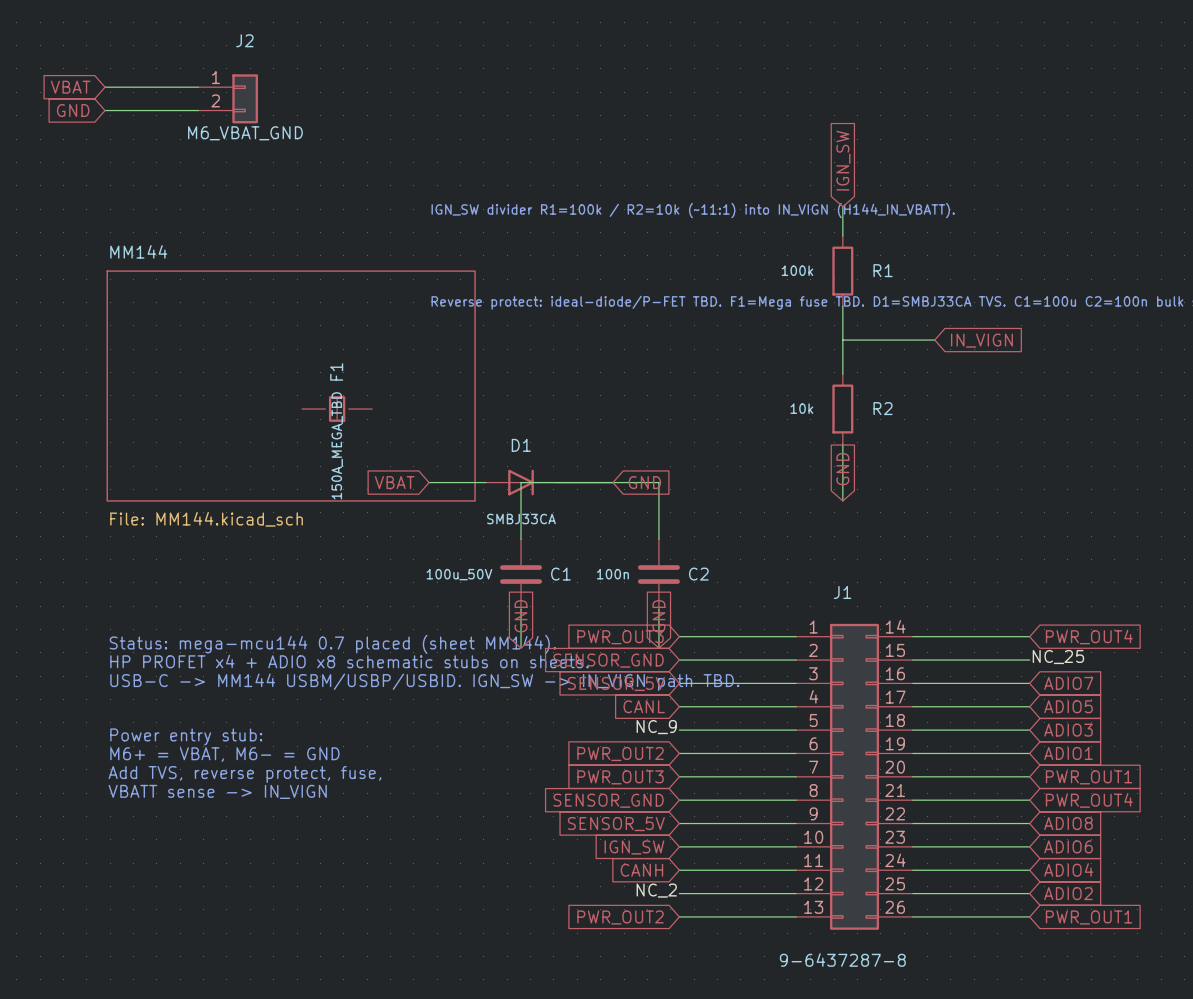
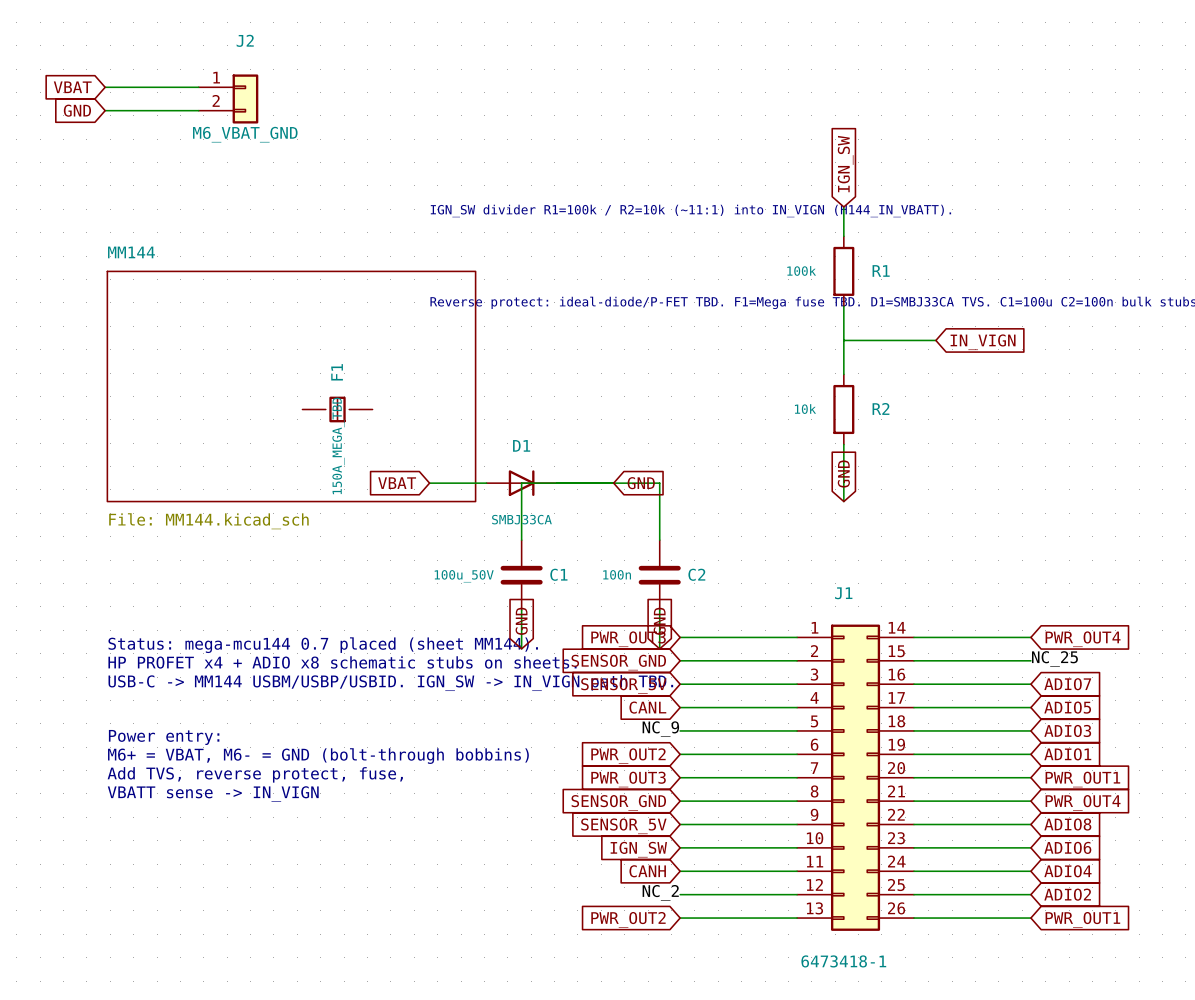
text: Power entry stub: (186, 736) -> Power entry: (164, 737)
text: M6+ = VBAT, M6- = GND (224, 754) -> M6+ = VBAT, M6- = GND (bolt-through bobbins) (318, 756)
J1 value: 9-6437287-8 (842, 960) -> 6473418-1 (843, 961)

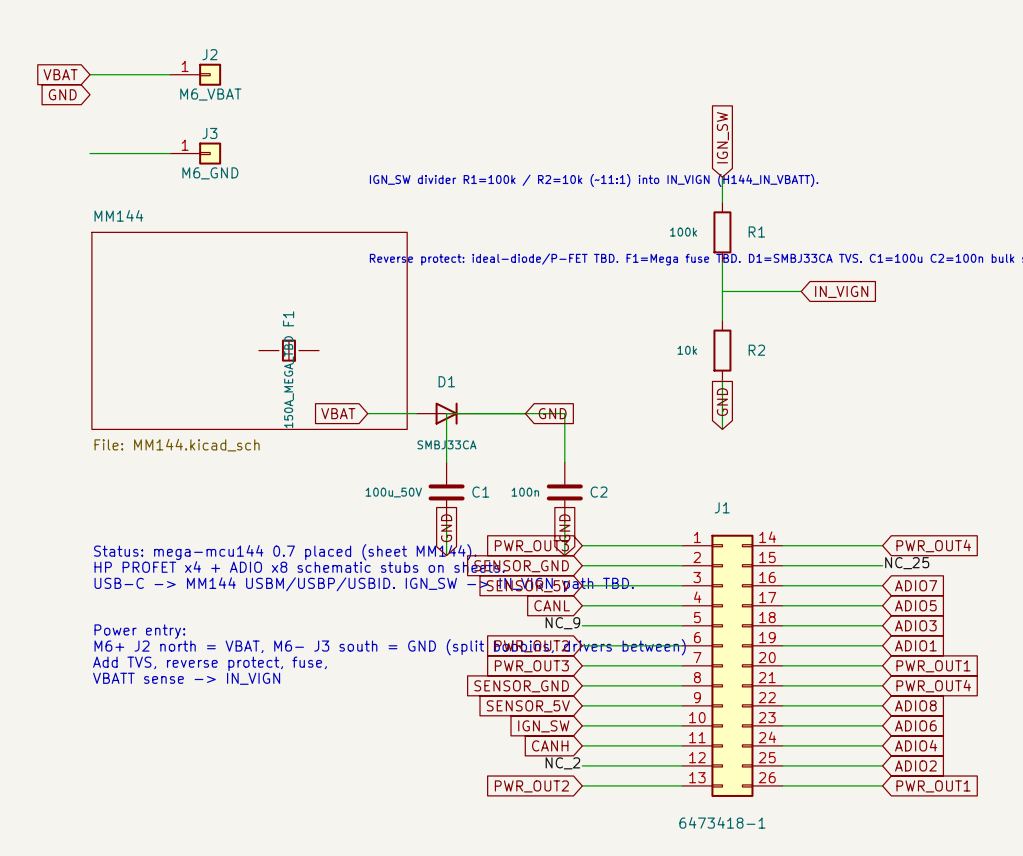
J2 name position: J2 (245, 40) -> J2 (209, 54)
J2 symbol: [198, 74, 259, 124] -> [170, 63, 222, 86]
wire: (105, 110) (198, 110) -> (90, 153) (170, 153)
J2 value: M6_VBAT_GND (245, 134) -> M6_VBAT (210, 94)
J3: none -> M6_GND (195, 153)
text: M6+ = VBAT, M6- = GND (bolt-through bobbins) (318, 756) -> M6+ J2 north = VBAT, M6- J3 south = GND (split bobbins, drivers between) (390, 647)

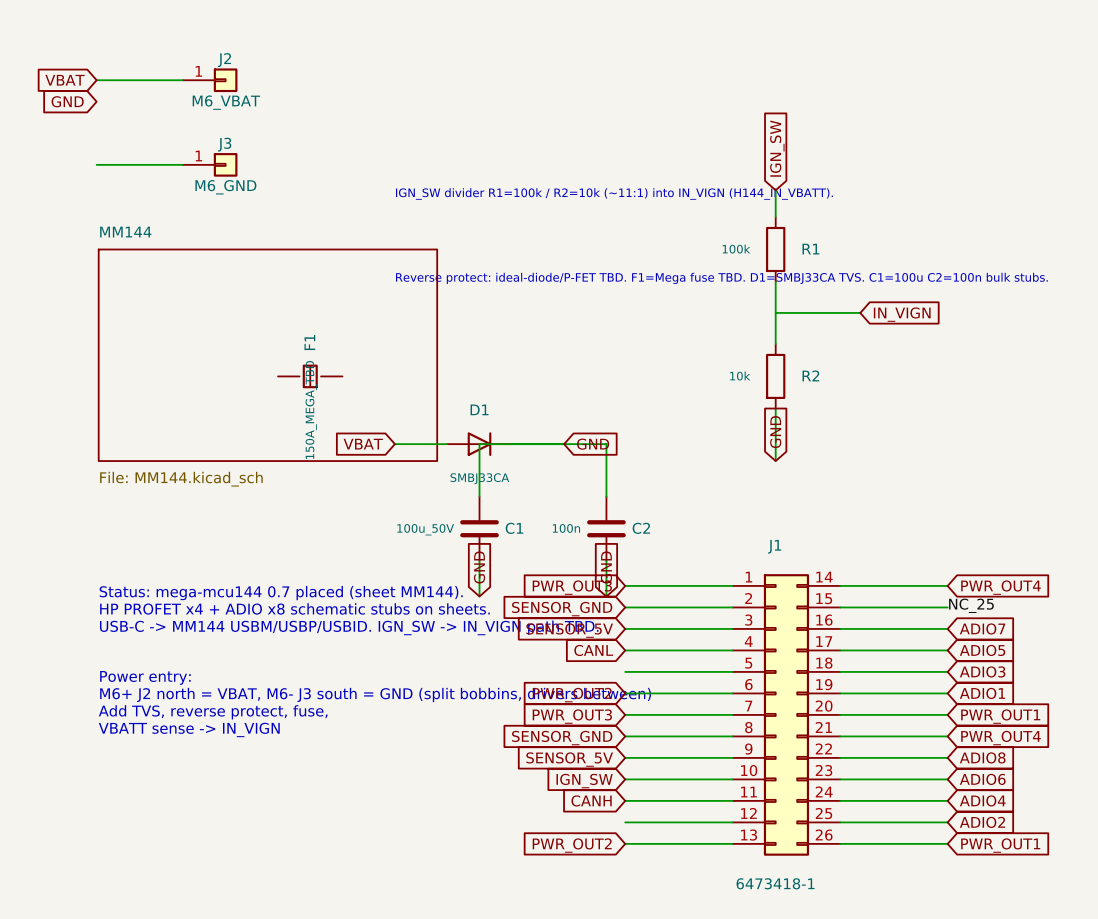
label: NC_9 (562, 623) -> none
label: NC_2 (562, 763) -> none

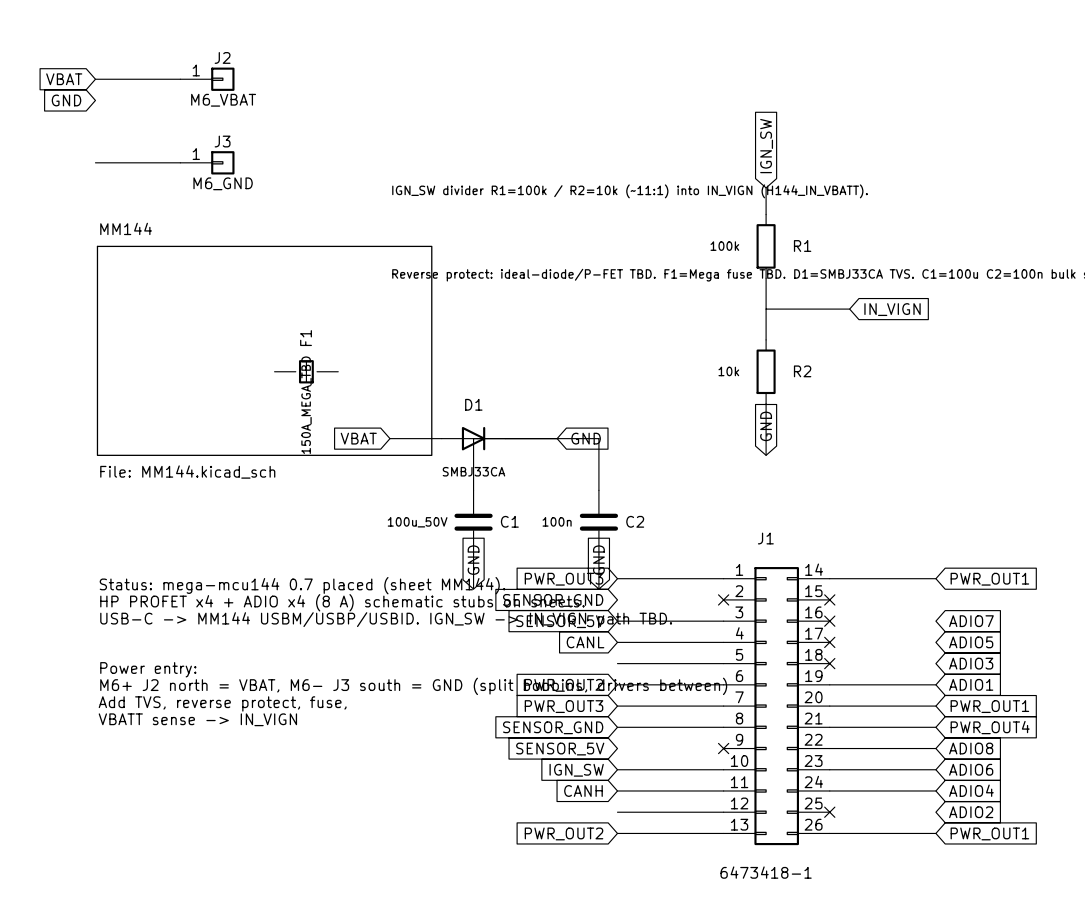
global label: PWR_OUT4 (1000, 587) -> PWR_OUT1 (989, 579)
label: NC_25 (971, 605) -> none
wire: (625, 607) (732, 607) -> none
no-connect mark: none -> (723, 599)
wire: (840, 607) (947, 607) -> none
no-connect mark: none -> (829, 599)
text: HP PROFET x4 + ADIO x8 schematic stubs on sheets. (294, 608) -> HP PROFET x4 + ADIO x4 (8 A) schematic stubs on sheets. (342, 602)
wire: (840, 628) (947, 628) -> none
no-connect mark: none -> (829, 621)
wire: (840, 650) (947, 650) -> none
no-connect mark: none -> (829, 642)
wire: (840, 671) (947, 671) -> none
no-connect mark: none -> (829, 663)
wire: (625, 757) (732, 757) -> none
no-connect mark: none -> (723, 748)
wire: (840, 822) (947, 822) -> none
no-connect mark: none -> (829, 812)

